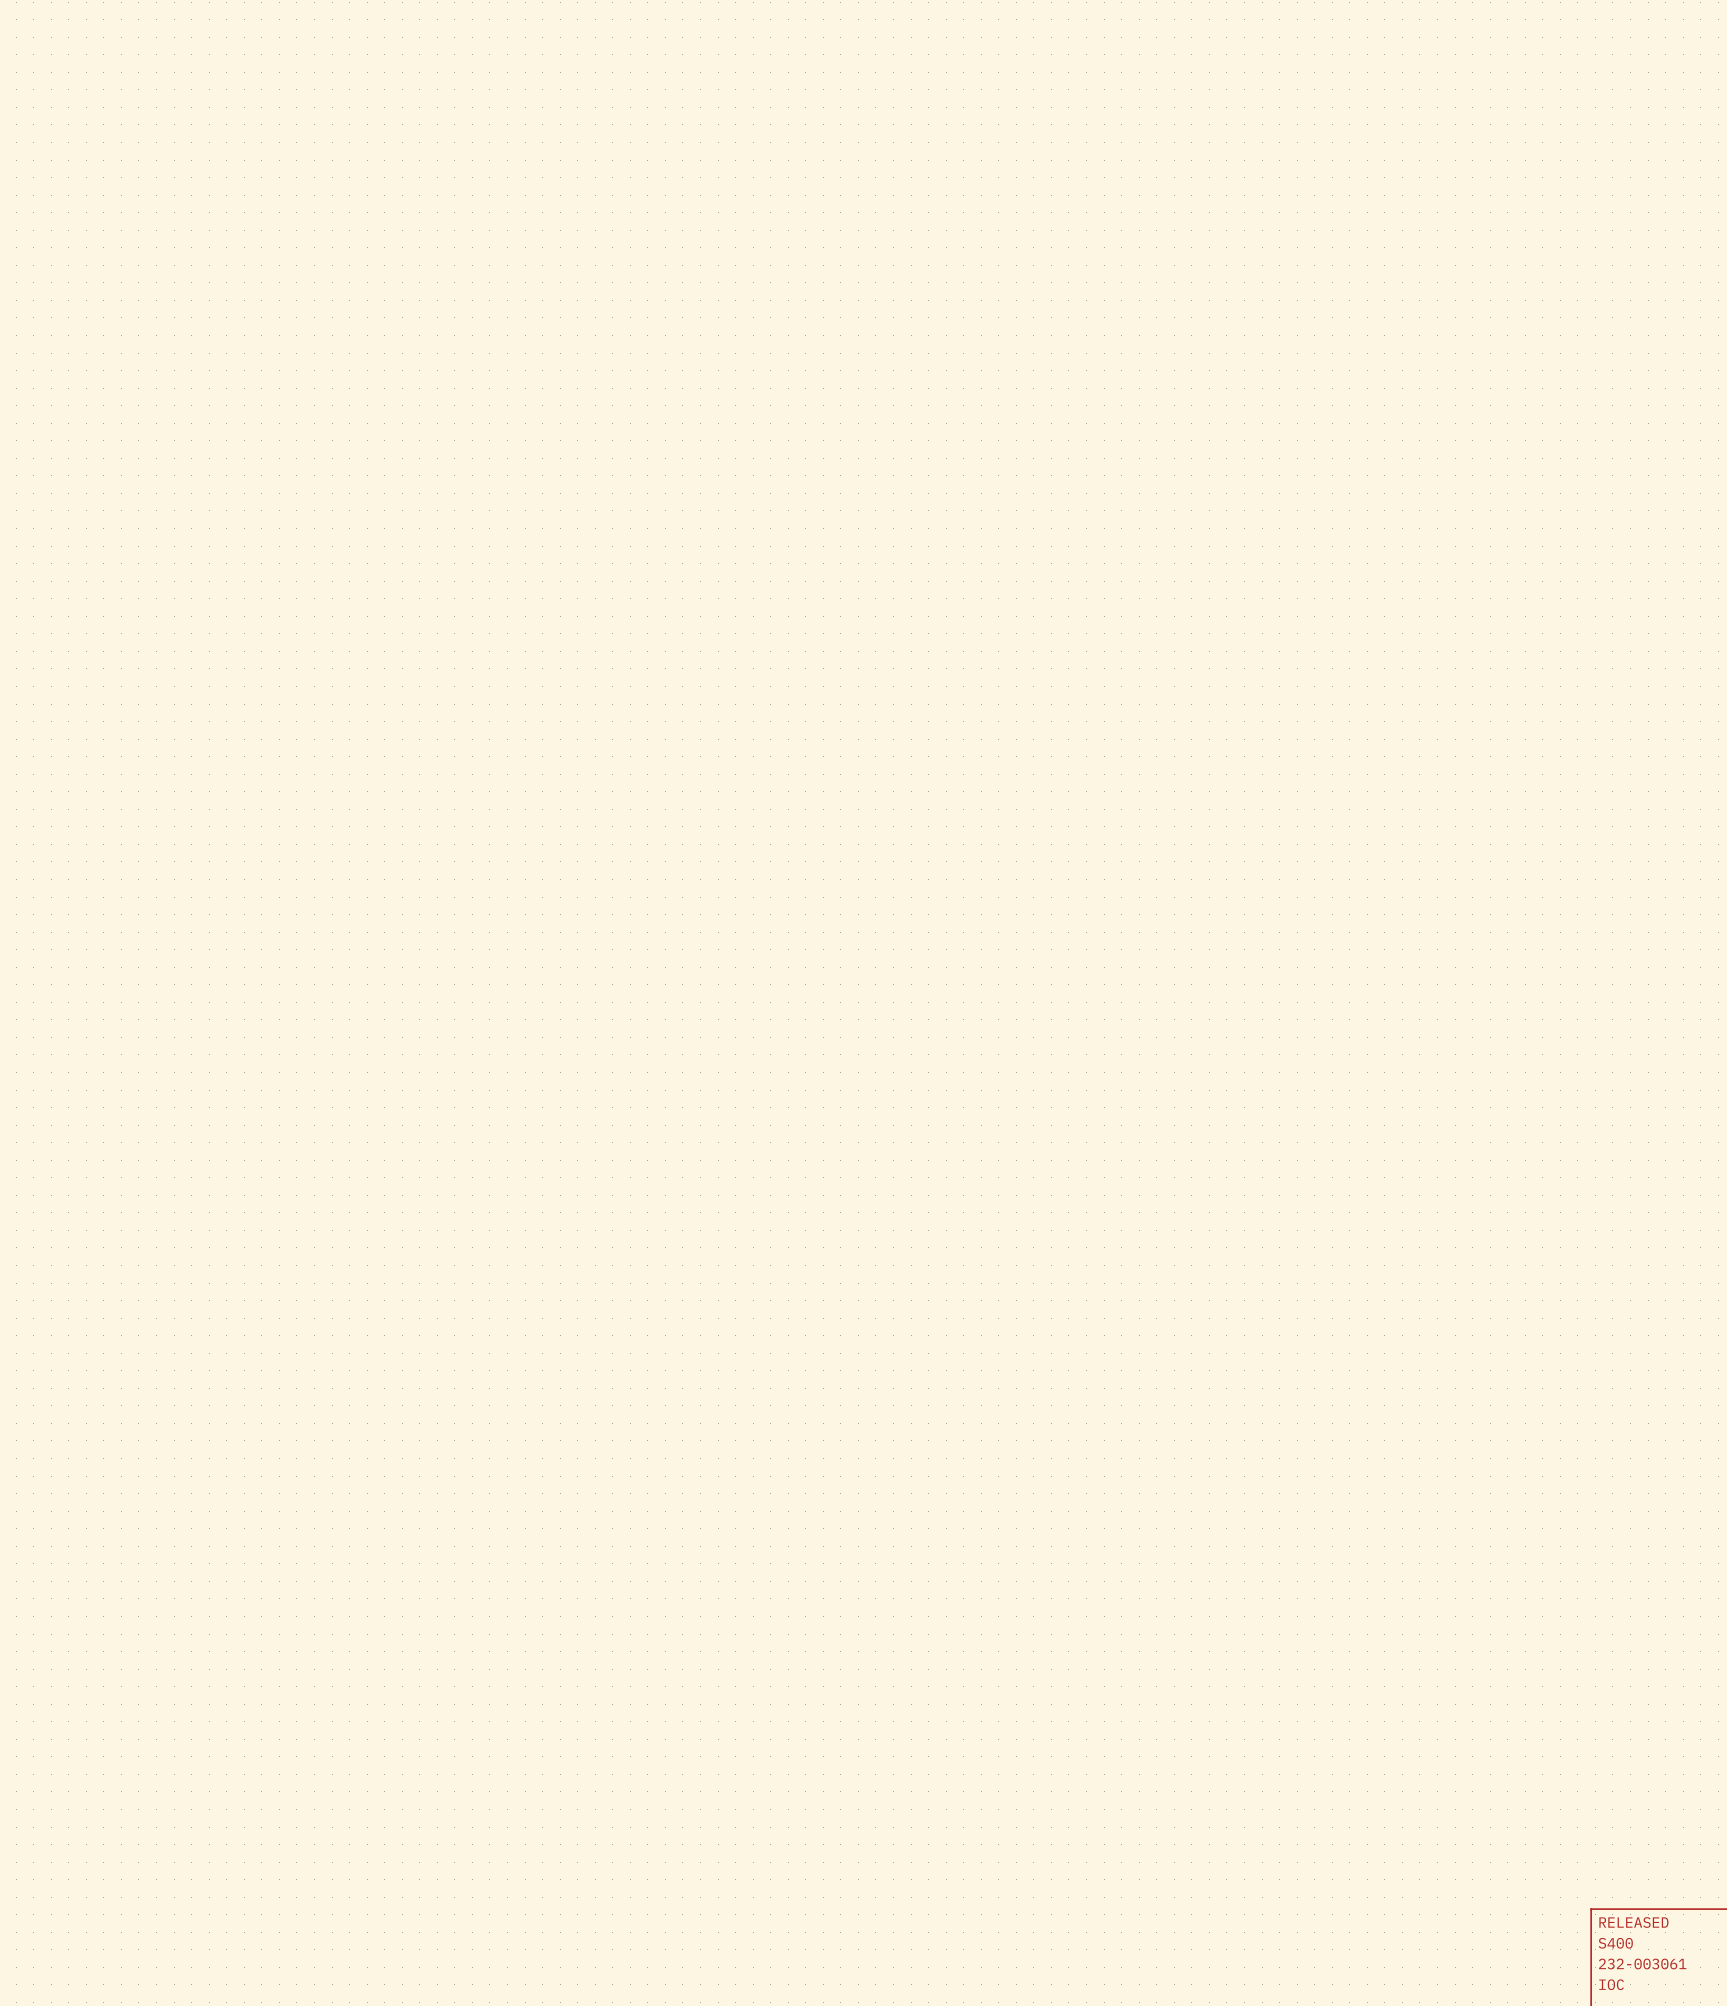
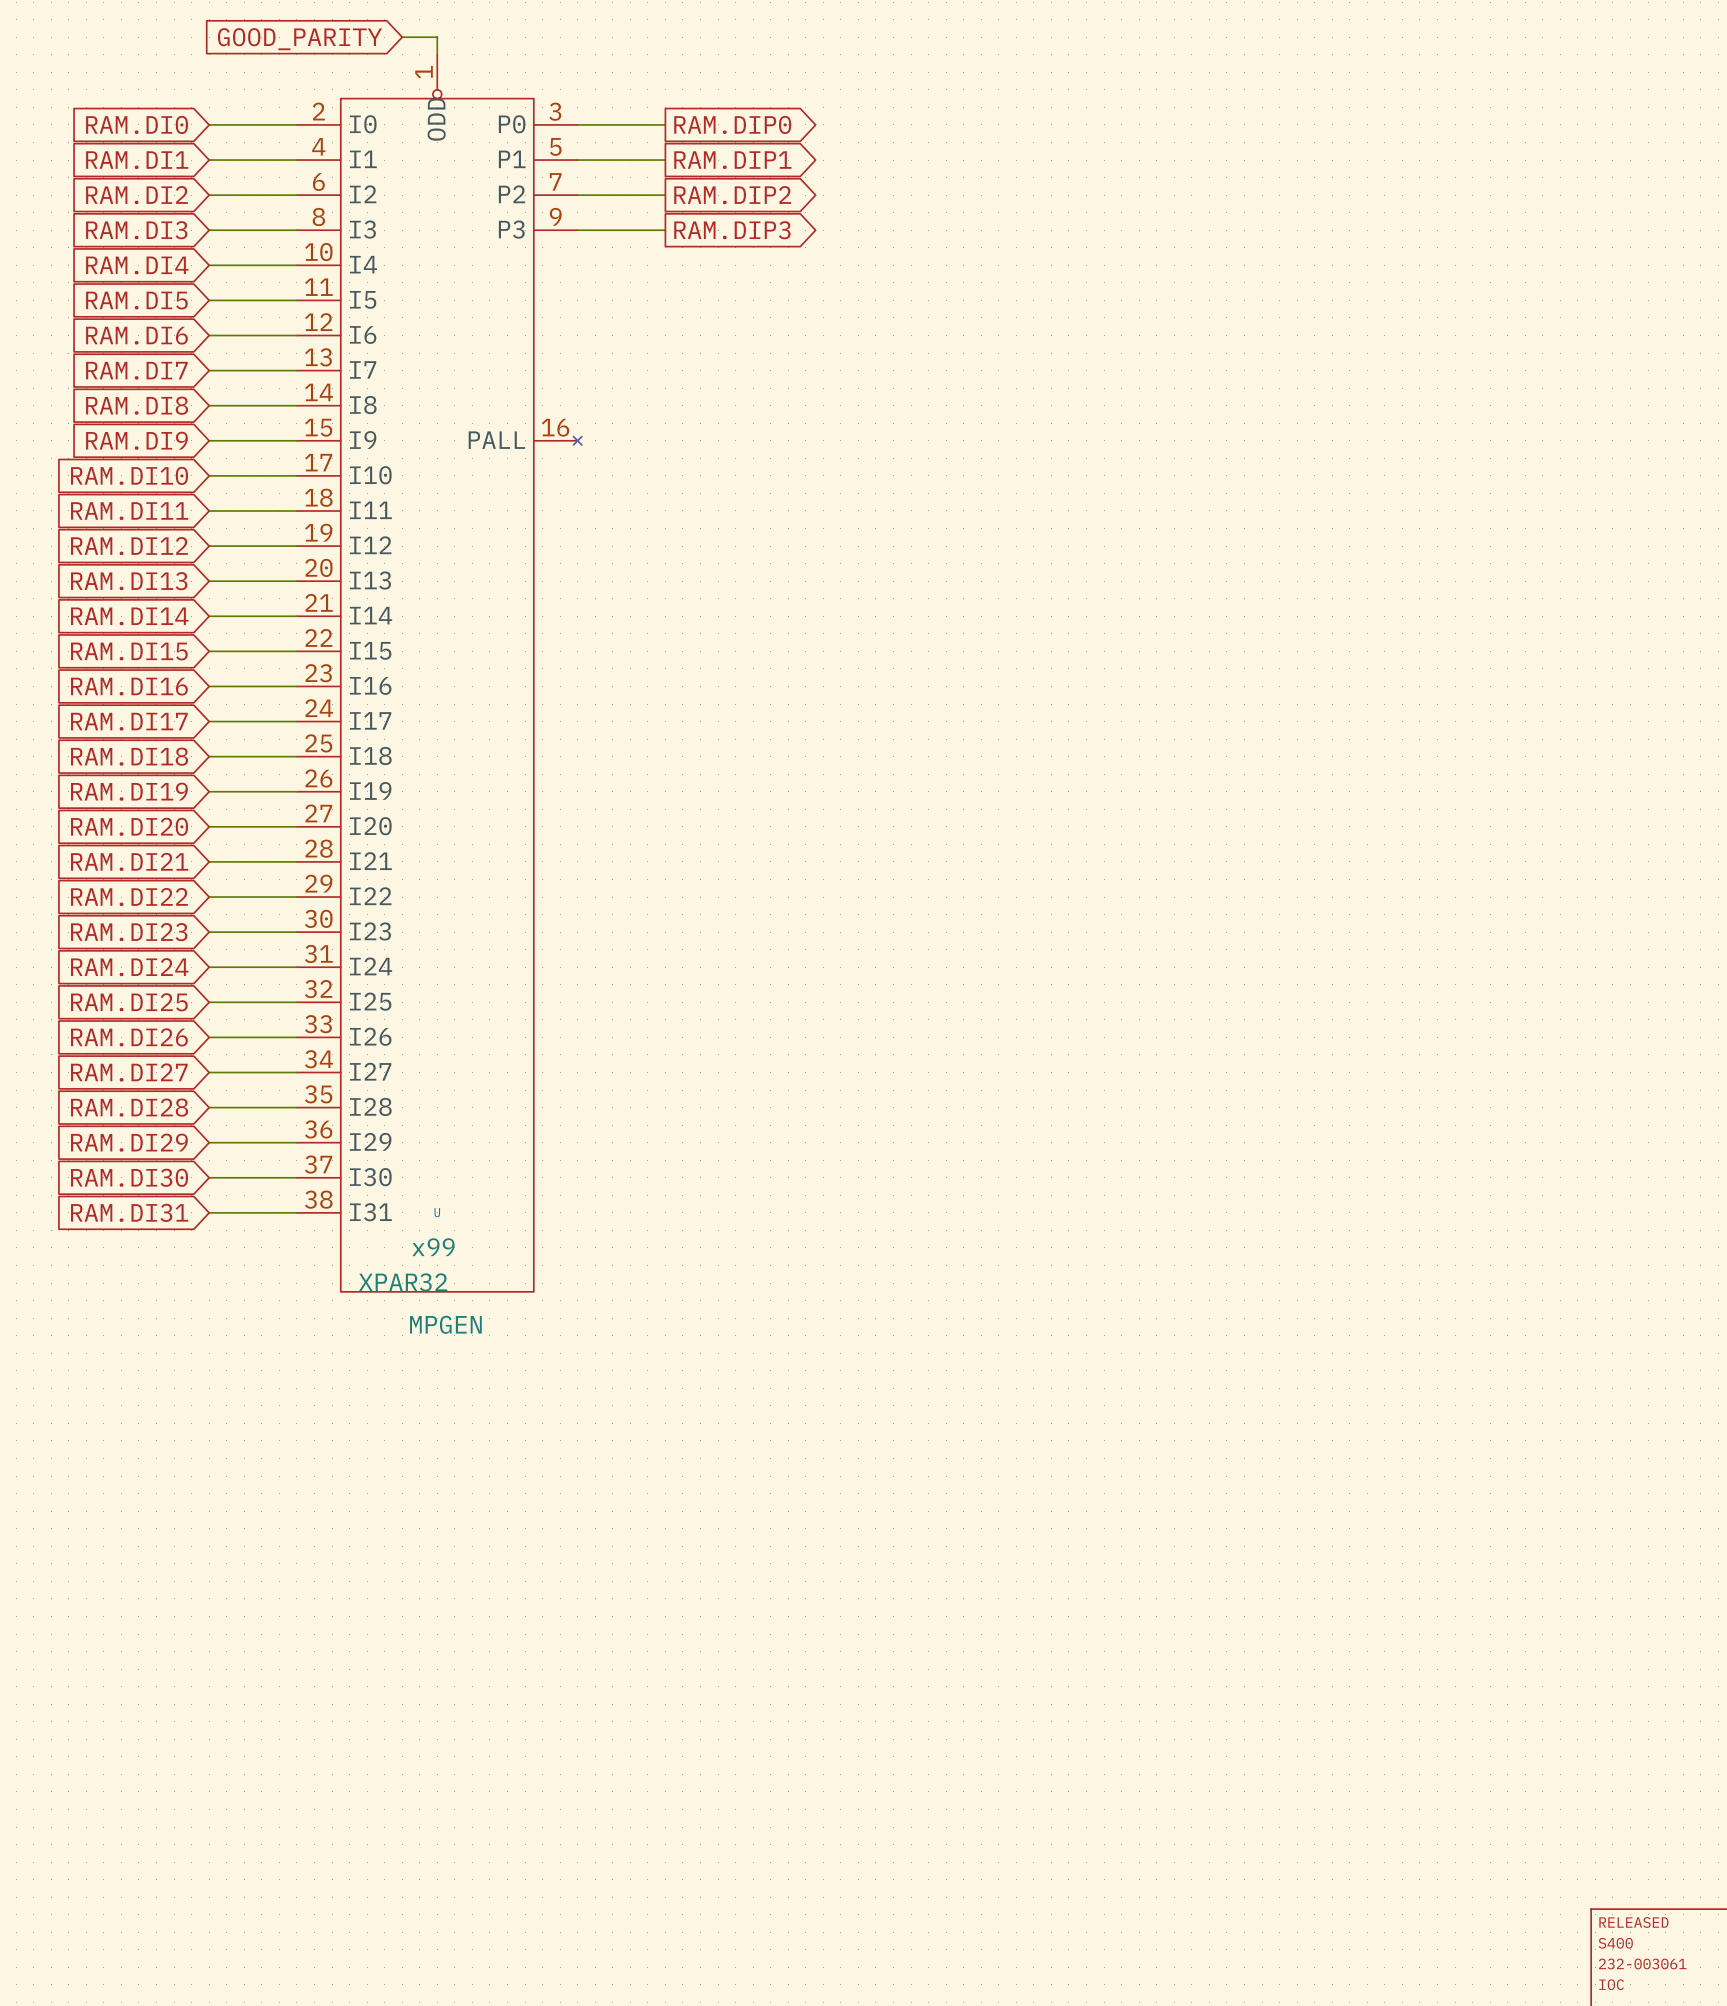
wire: none -> (402, 37) (437, 37) (437, 54)
global label: none -> GOOD_PARITY (299, 39)
global label: none -> RAM.DI0 (137, 124)
wire: none -> (209, 124) (296, 124)
wire: none -> (577, 124) (665, 124)
global label: none -> RAM.DIP0 (732, 124)
global label: none -> RAM.DI1 (137, 160)
wire: none -> (209, 160) (296, 160)
wire: none -> (577, 160) (665, 160)
global label: none -> RAM.DIP1 (732, 160)
global label: none -> RAM.DI2 (136, 195)
wire: none -> (209, 195) (296, 195)
wire: none -> (577, 195) (665, 195)
global label: none -> RAM.DIP2 (732, 195)
global label: none -> RAM.DI3 (136, 230)
wire: none -> (209, 230) (296, 230)
wire: none -> (577, 230) (665, 230)
global label: none -> RAM.DIP3 (732, 230)
global label: none -> RAM.DI4 (137, 265)
wire: none -> (209, 265) (296, 265)
global label: none -> RAM.DI5 (136, 300)
wire: none -> (209, 300) (296, 300)
global label: none -> RAM.DI6 (136, 335)
wire: none -> (209, 335) (296, 335)
global label: none -> RAM.DI7 (136, 370)
wire: none -> (209, 370) (296, 370)
global label: none -> RAM.DI8 (137, 405)
wire: none -> (209, 405) (296, 405)
global label: none -> RAM.DI9 (136, 440)
wire: none -> (209, 440) (296, 440)
no-connect mark: none -> (577, 440)
global label: none -> RAM.DI10 (129, 475)
wire: none -> (209, 475) (296, 475)
wire: none -> (209, 510) (296, 510)
global label: none -> RAM.DI11 (129, 511)
global label: none -> RAM.DI12 (129, 546)
wire: none -> (209, 546) (296, 546)
global label: none -> RAM.DI13 (129, 581)
wire: none -> (209, 581) (296, 581)
global label: none -> RAM.DI14 (129, 616)
wire: none -> (209, 616) (296, 616)
global label: none -> RAM.DI15 (129, 651)
wire: none -> (209, 651) (296, 651)
U: none -> XPAR32 (437, 673)
global label: none -> RAM.DI16 (129, 686)
wire: none -> (209, 686) (296, 686)
global label: none -> RAM.DI17 (129, 721)
wire: none -> (209, 721) (296, 721)
global label: none -> RAM.DI18 (129, 756)
wire: none -> (209, 756) (296, 756)
global label: none -> RAM.DI19 (129, 791)
wire: none -> (209, 791) (296, 791)
global label: none -> RAM.DI20 (129, 826)
wire: none -> (209, 826) (296, 826)
global label: none -> RAM.DI21 (129, 861)
wire: none -> (209, 861) (296, 861)
global label: none -> RAM.DI22 (129, 896)
wire: none -> (209, 897) (296, 897)
global label: none -> RAM.DI23 (129, 932)
wire: none -> (209, 932) (296, 932)
global label: none -> RAM.DI24 (129, 967)
wire: none -> (209, 967) (296, 967)
global label: none -> RAM.DI25 (129, 1002)
wire: none -> (209, 1002) (296, 1002)
global label: none -> RAM.DI26 (129, 1037)
wire: none -> (209, 1037) (296, 1037)
global label: none -> RAM.DI27 (129, 1072)
wire: none -> (209, 1072) (296, 1072)
global label: none -> RAM.DI28 (129, 1107)
wire: none -> (209, 1107) (296, 1107)
global label: none -> RAM.DI29 (129, 1142)
wire: none -> (209, 1142) (296, 1142)
global label: none -> RAM.DI30 (129, 1177)
wire: none -> (209, 1177) (296, 1177)
global label: none -> RAM.DI31 (129, 1212)
wire: none -> (209, 1212) (296, 1212)

